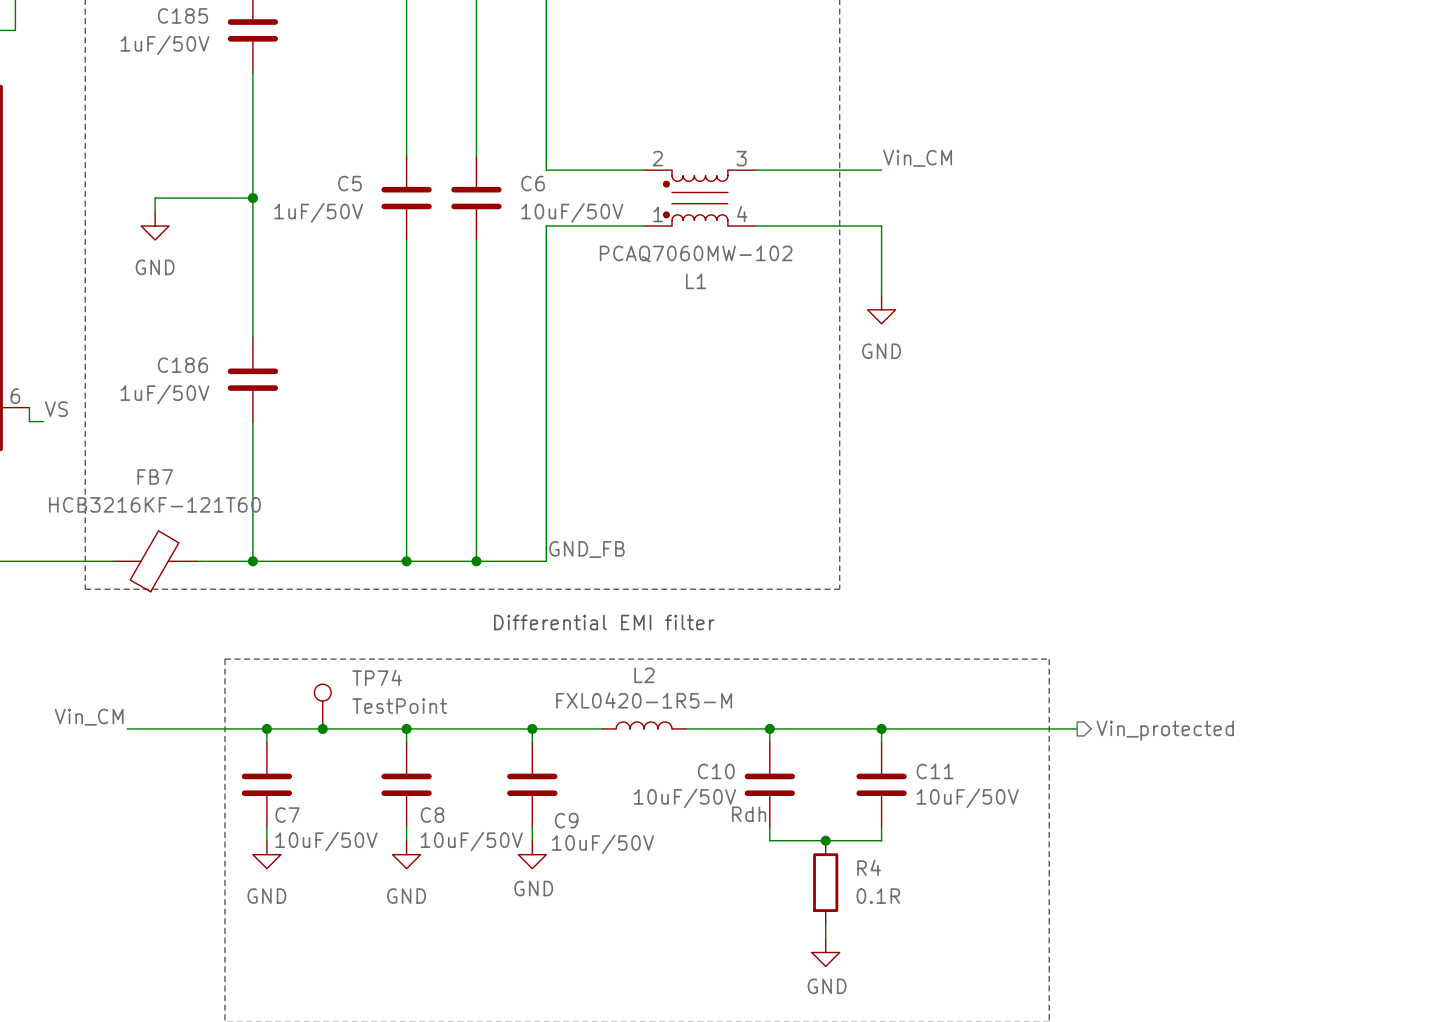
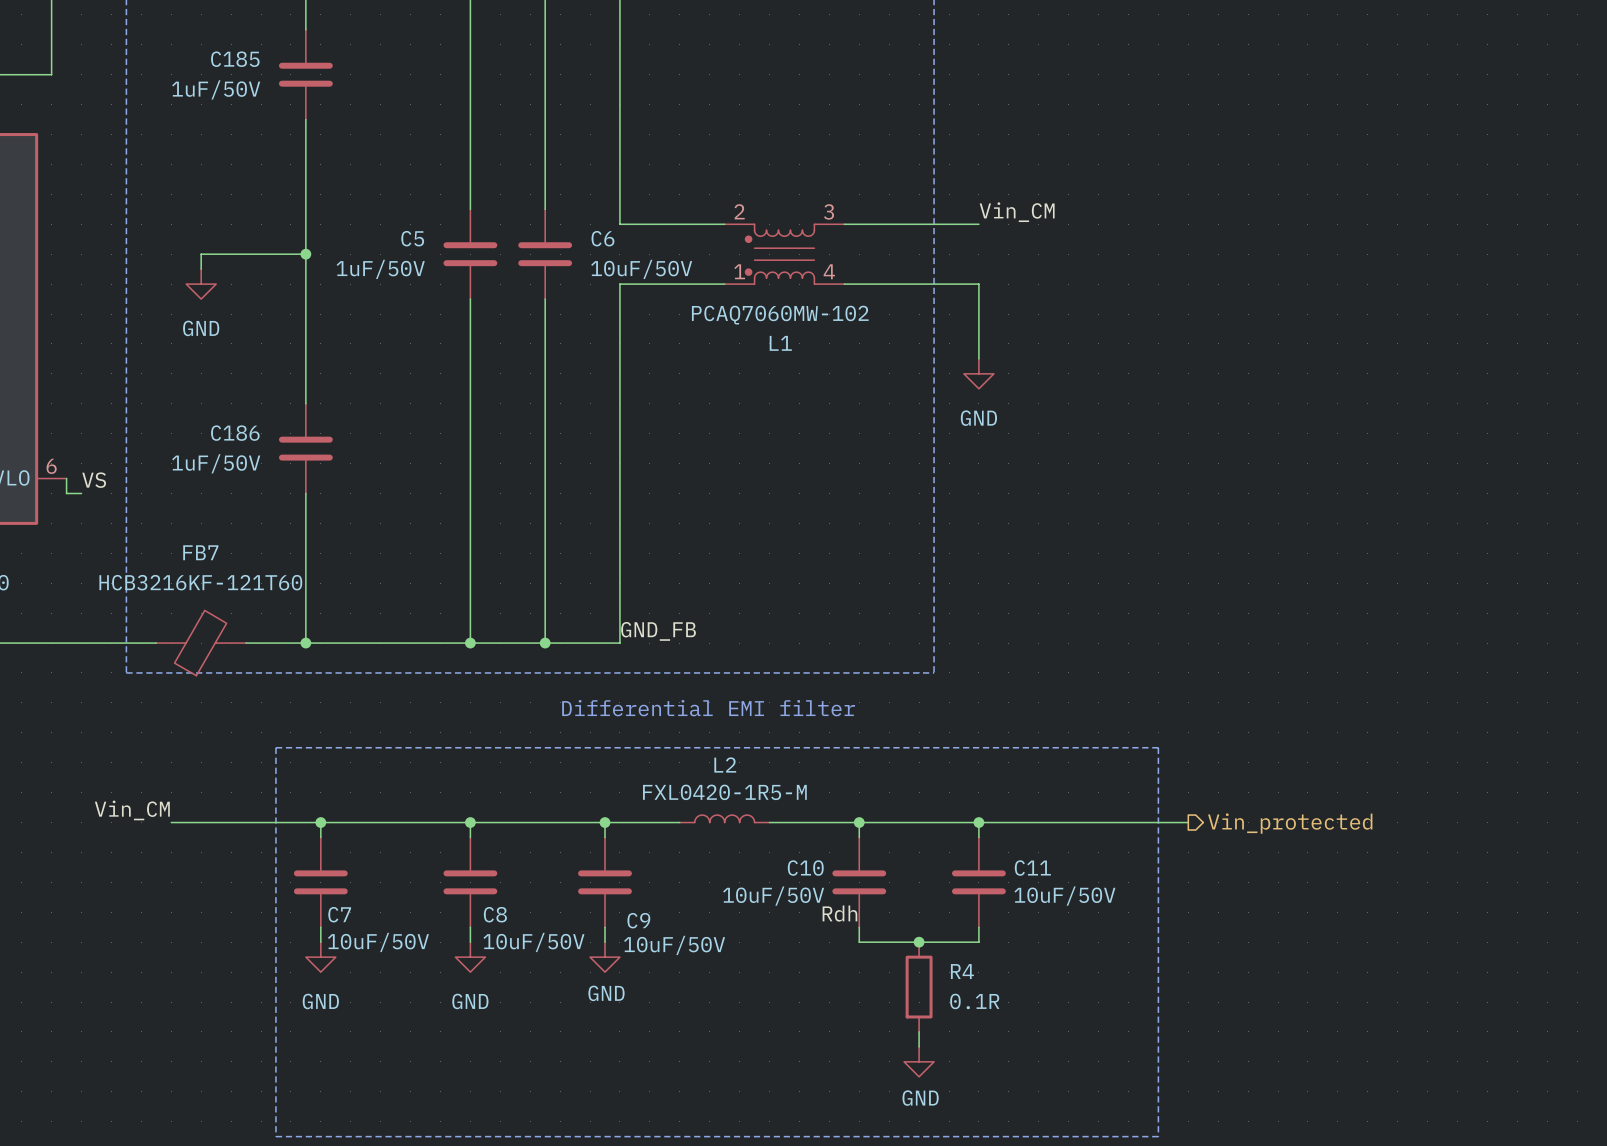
TP74: TestPoint (322, 706) -> none
junction: (322, 728) -> none

